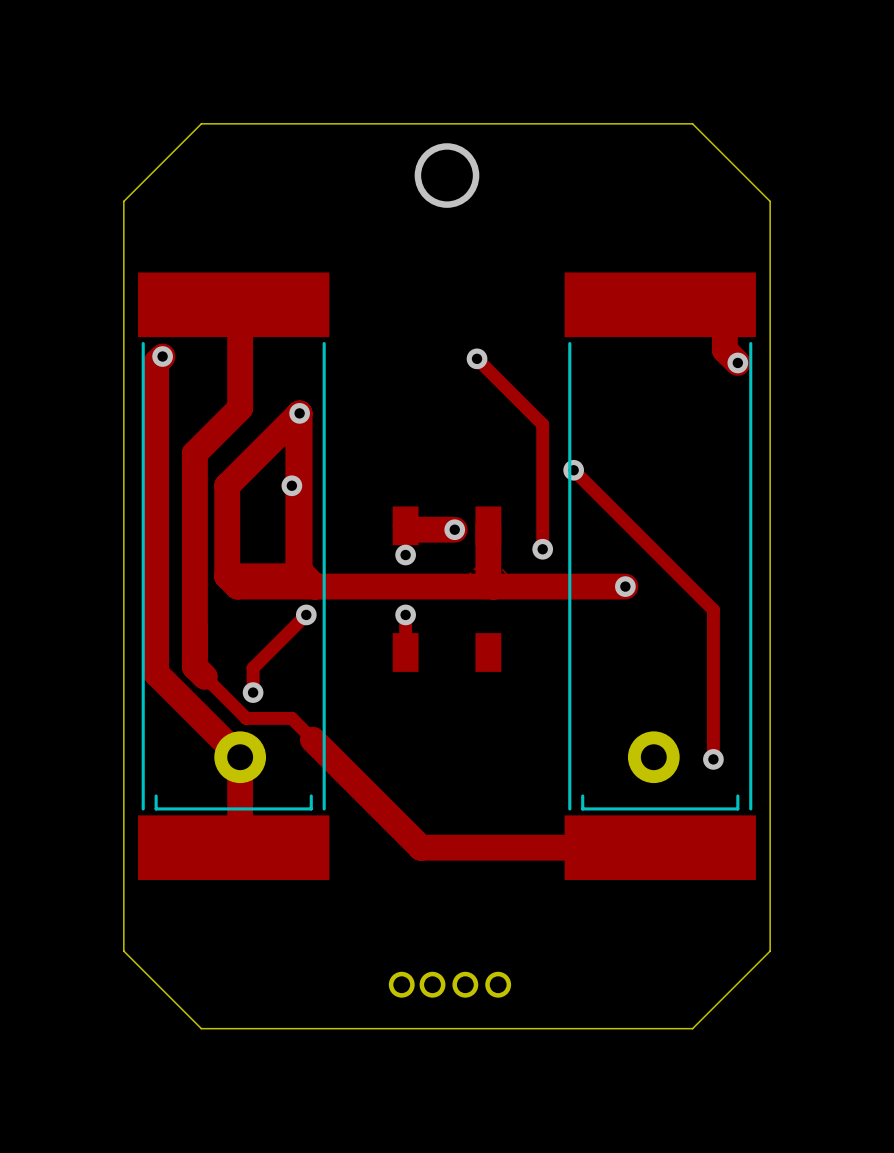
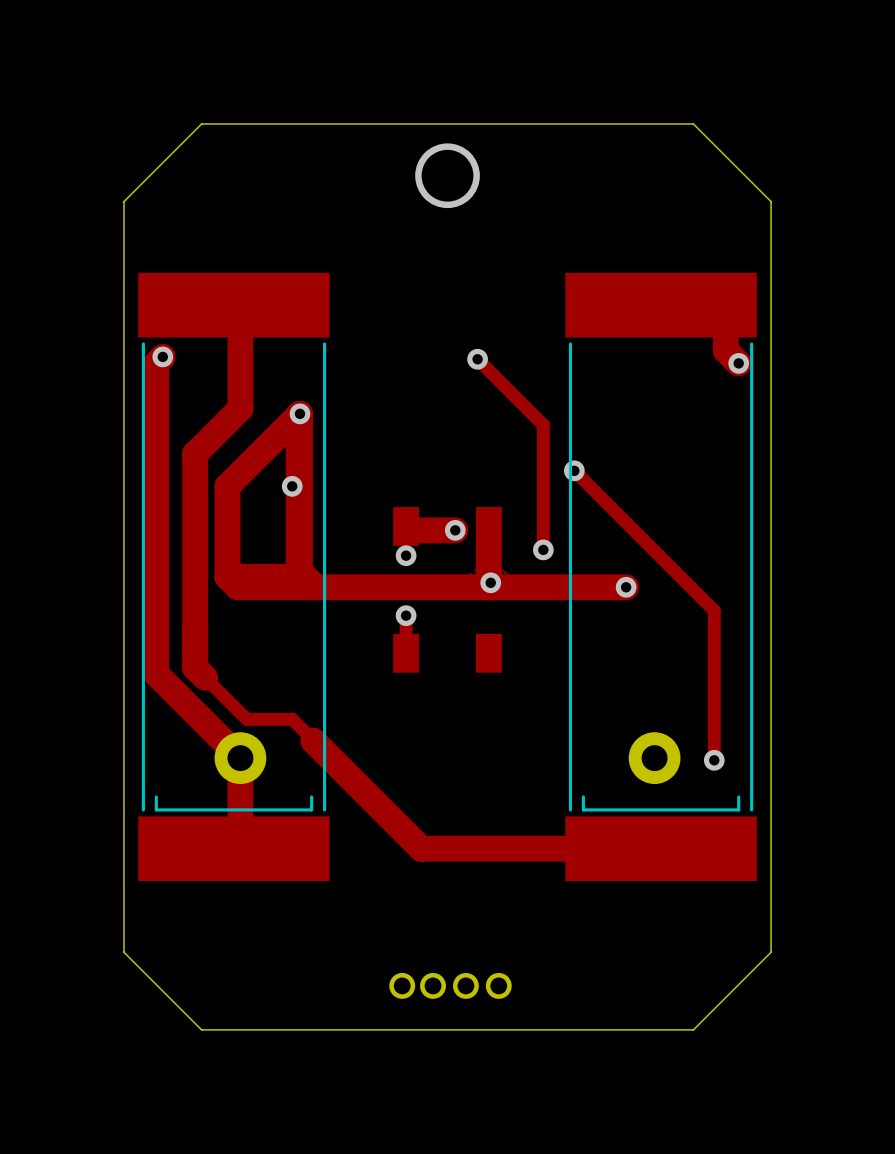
via: none -> (490, 582)
track: (306, 614) (253, 668) (253, 692) -> none
via: (306, 614) -> none
via: (253, 692) -> none

